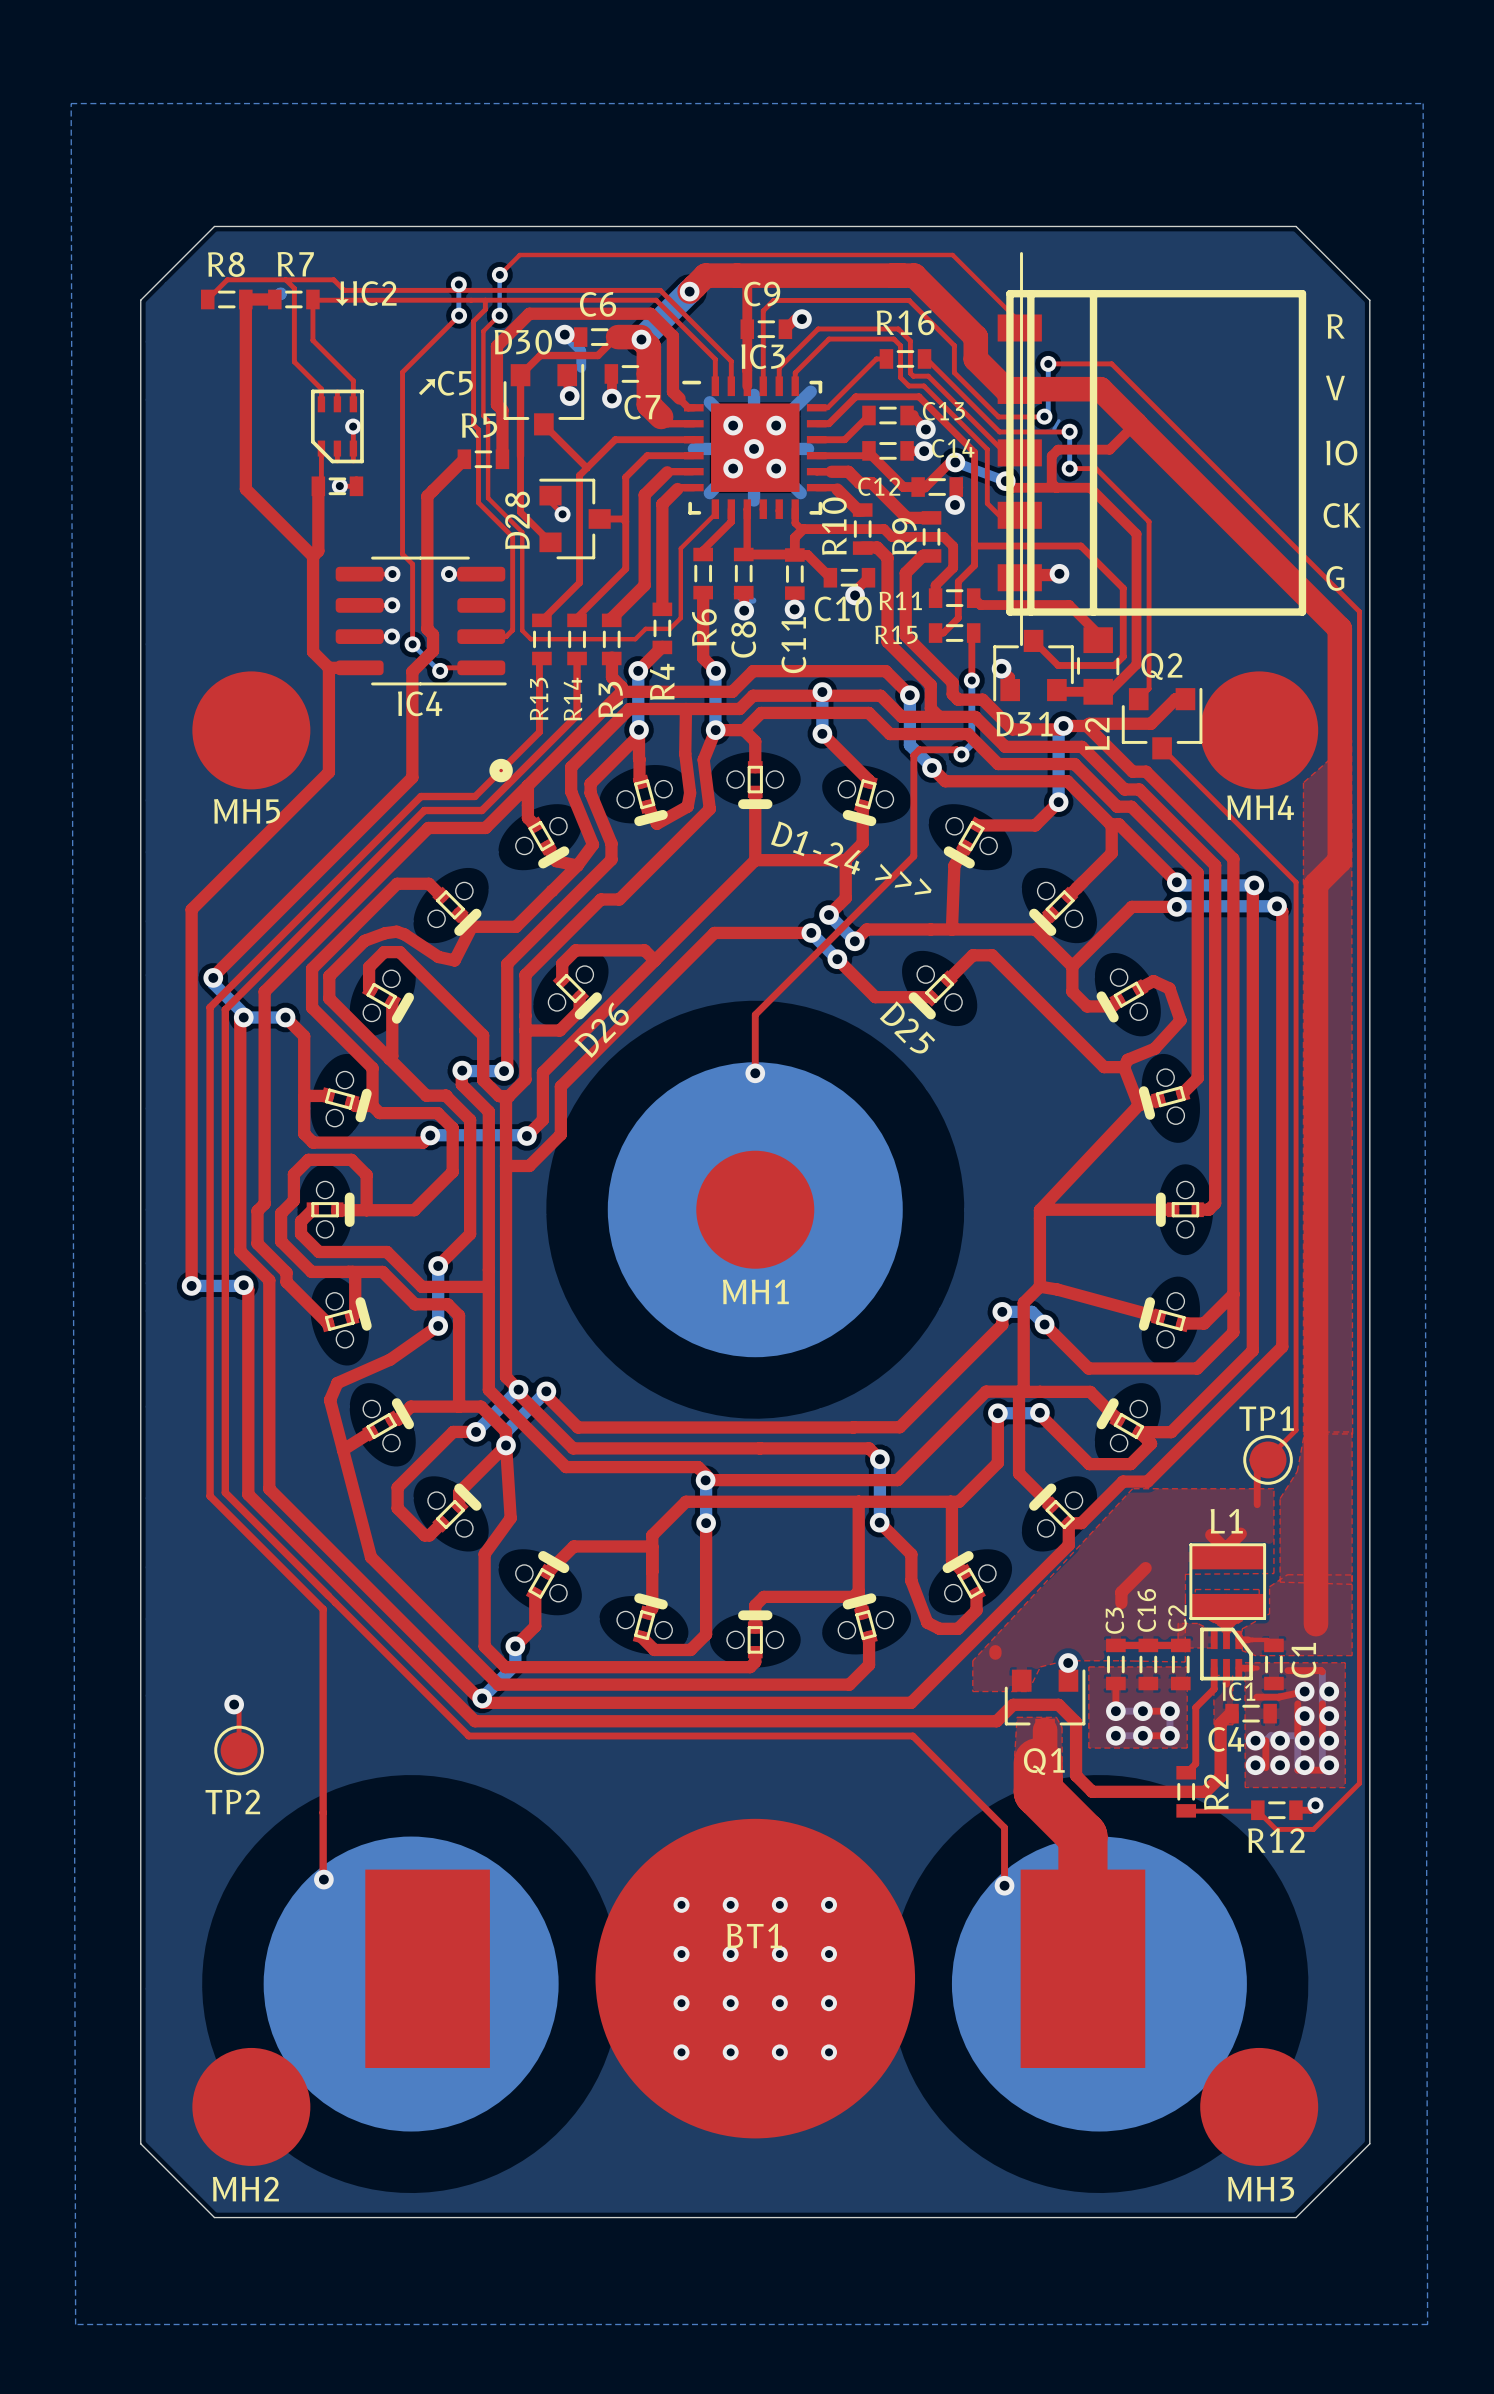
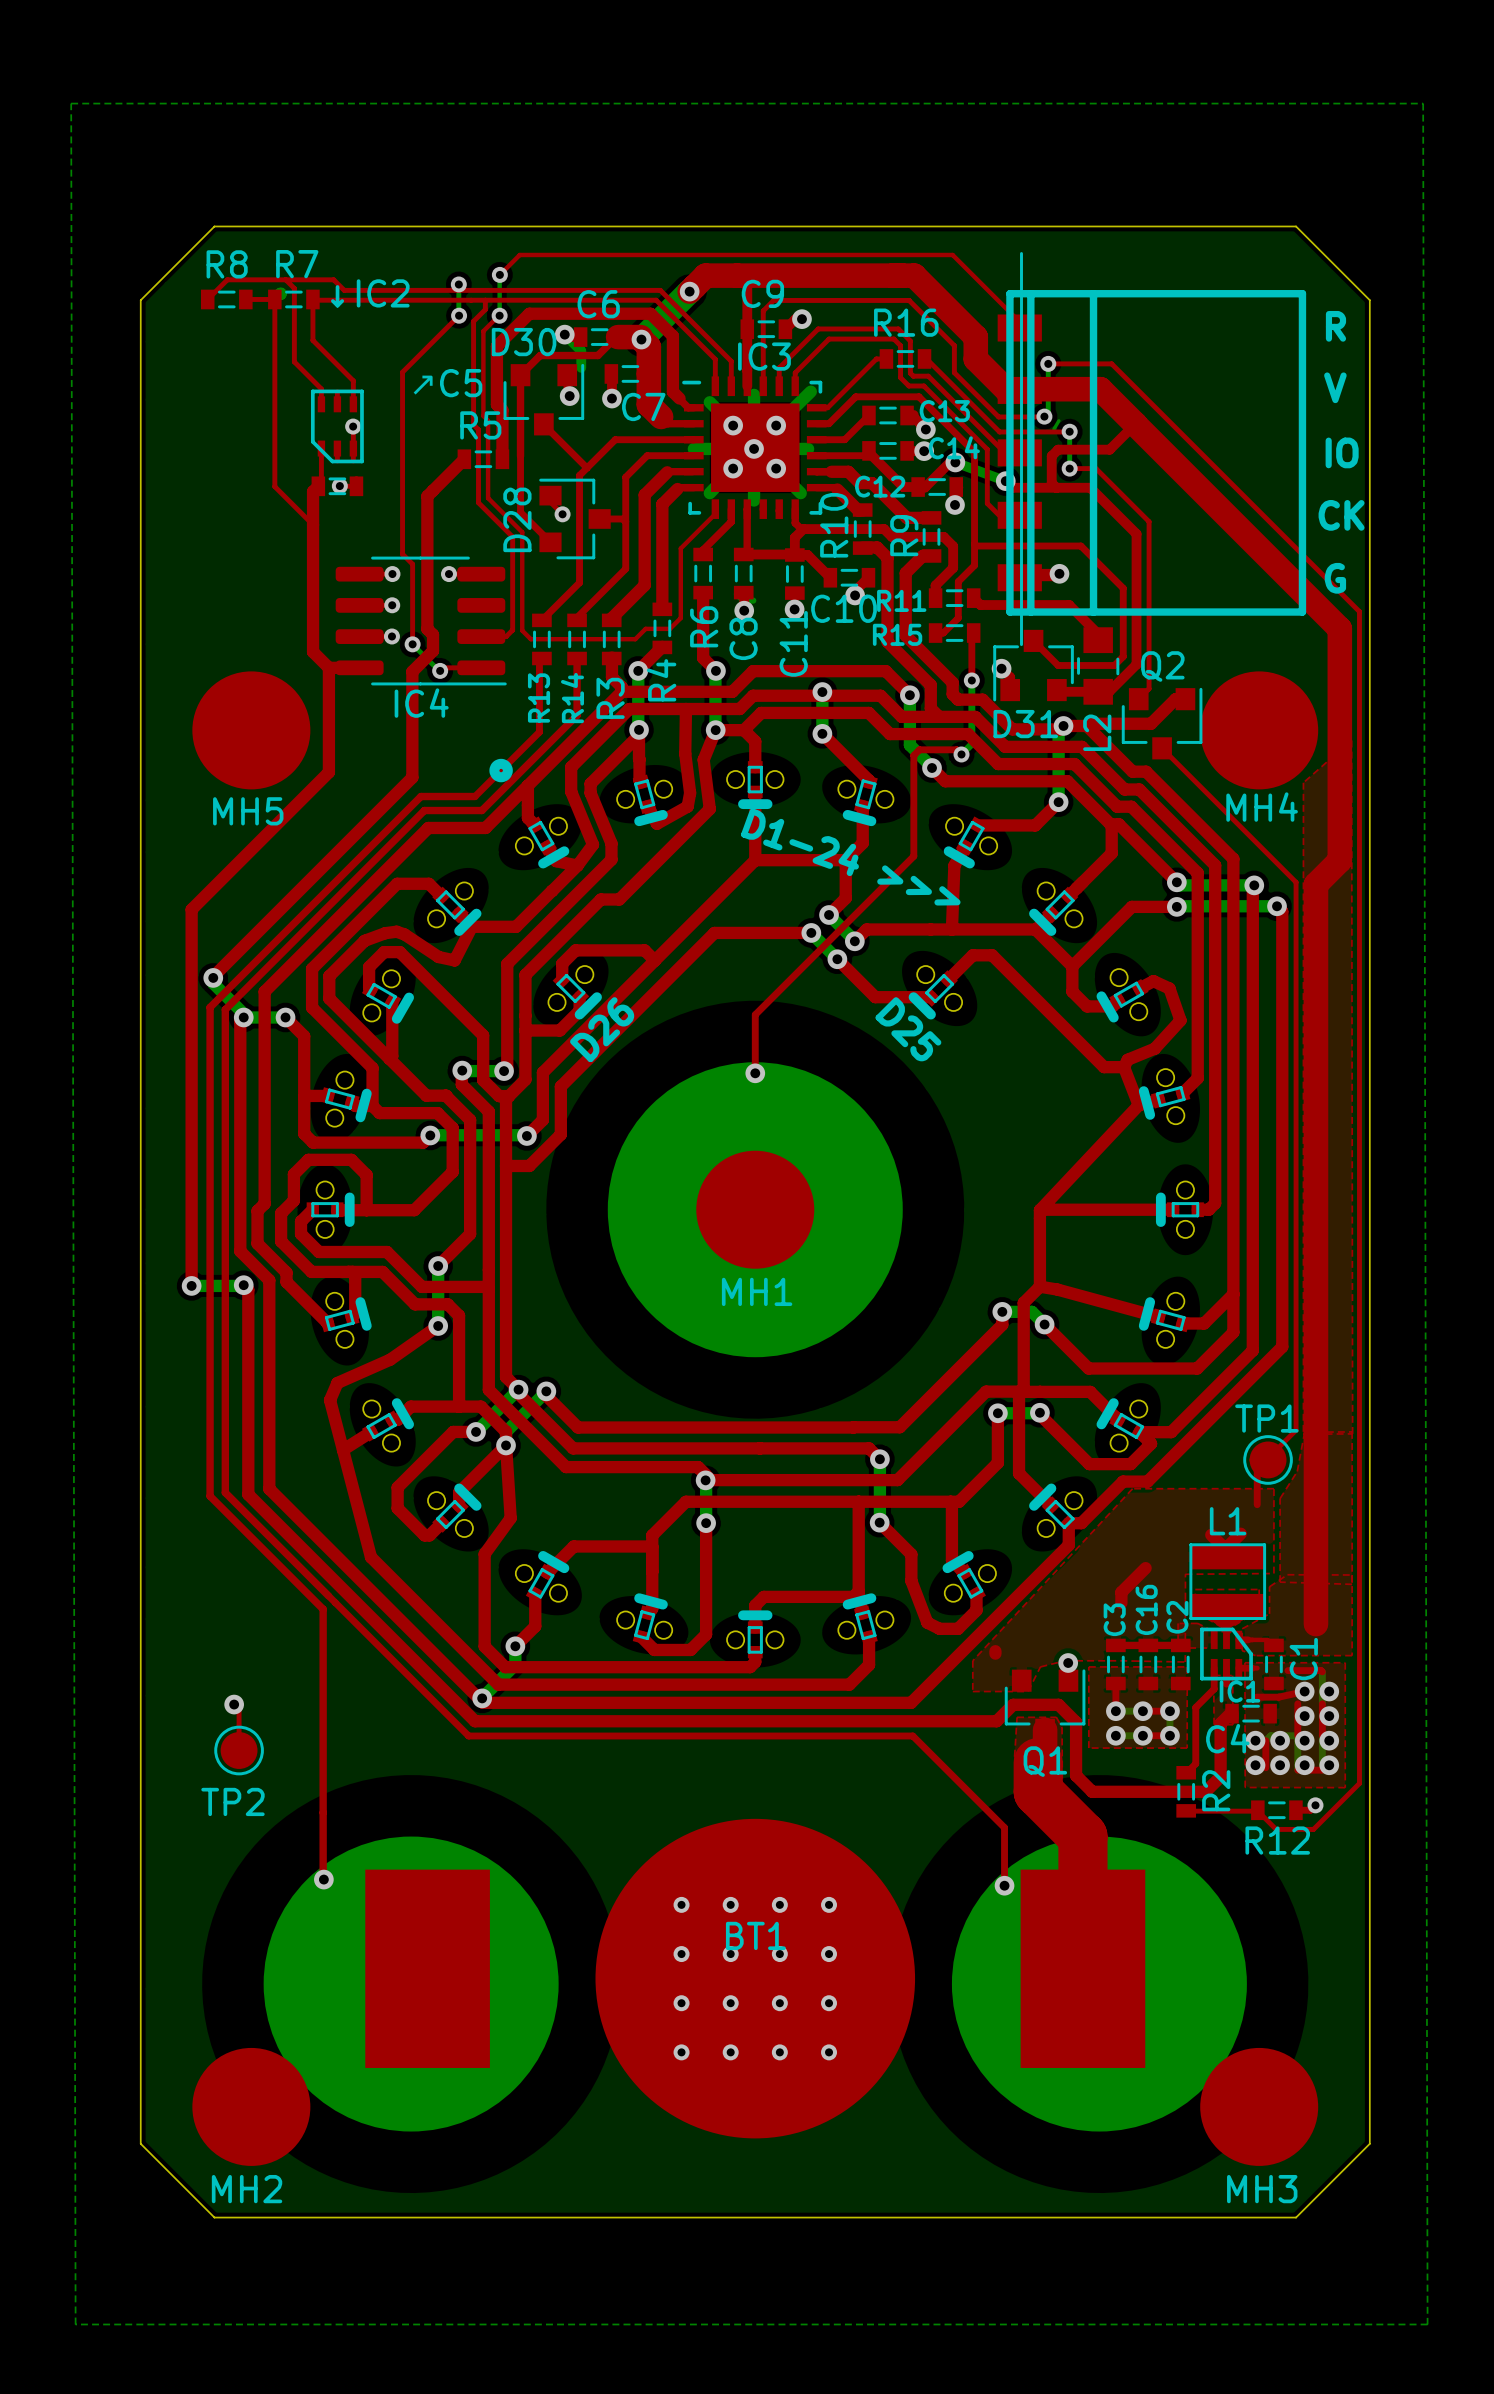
top track: (245, 299) (245, 489) (313, 556) (318, 551) (318, 486) -> (313, 556) (313, 491) (318, 486)
top track width: thick (245, 299) (274, 299) -> thin (245, 299) (274, 299)
top track: none -> (274, 299) (274, 486) (313, 524)

